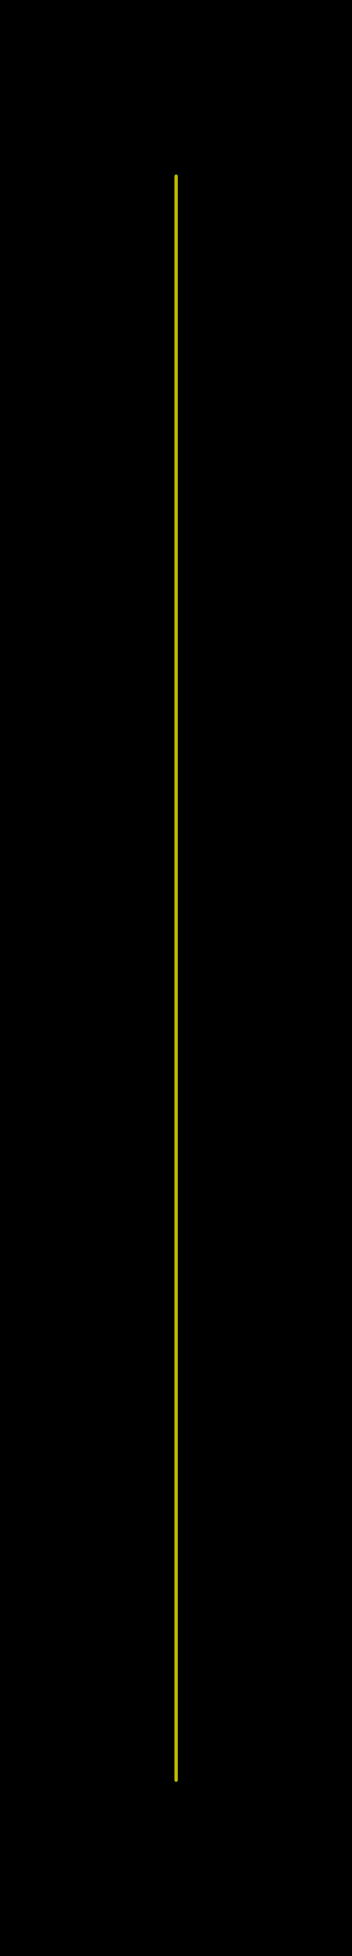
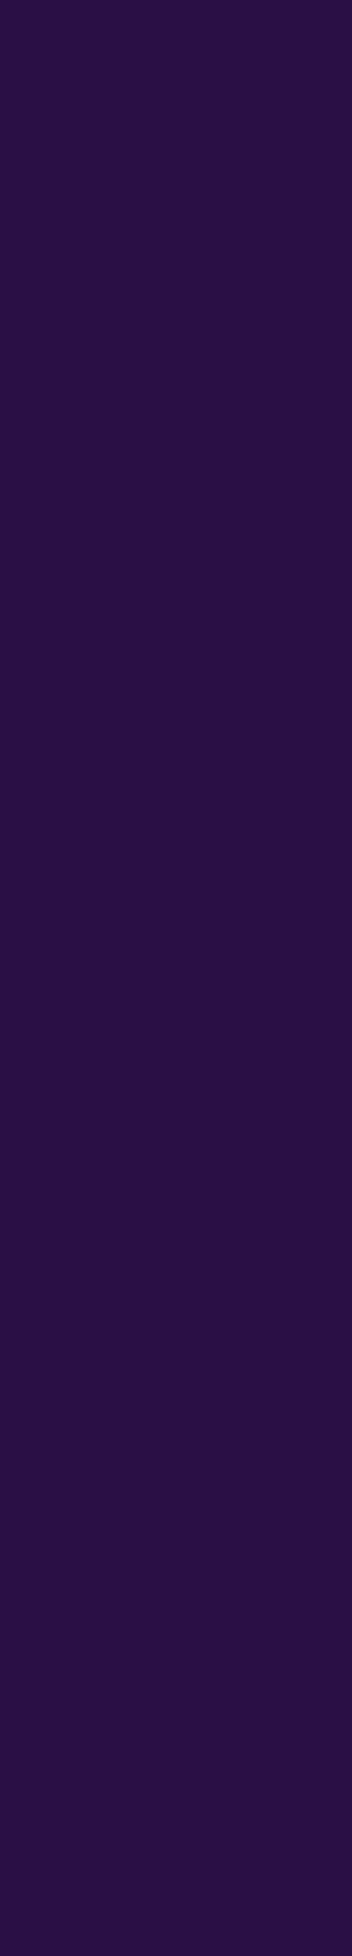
board edge: (176, 176) (176, 1780) -> none

